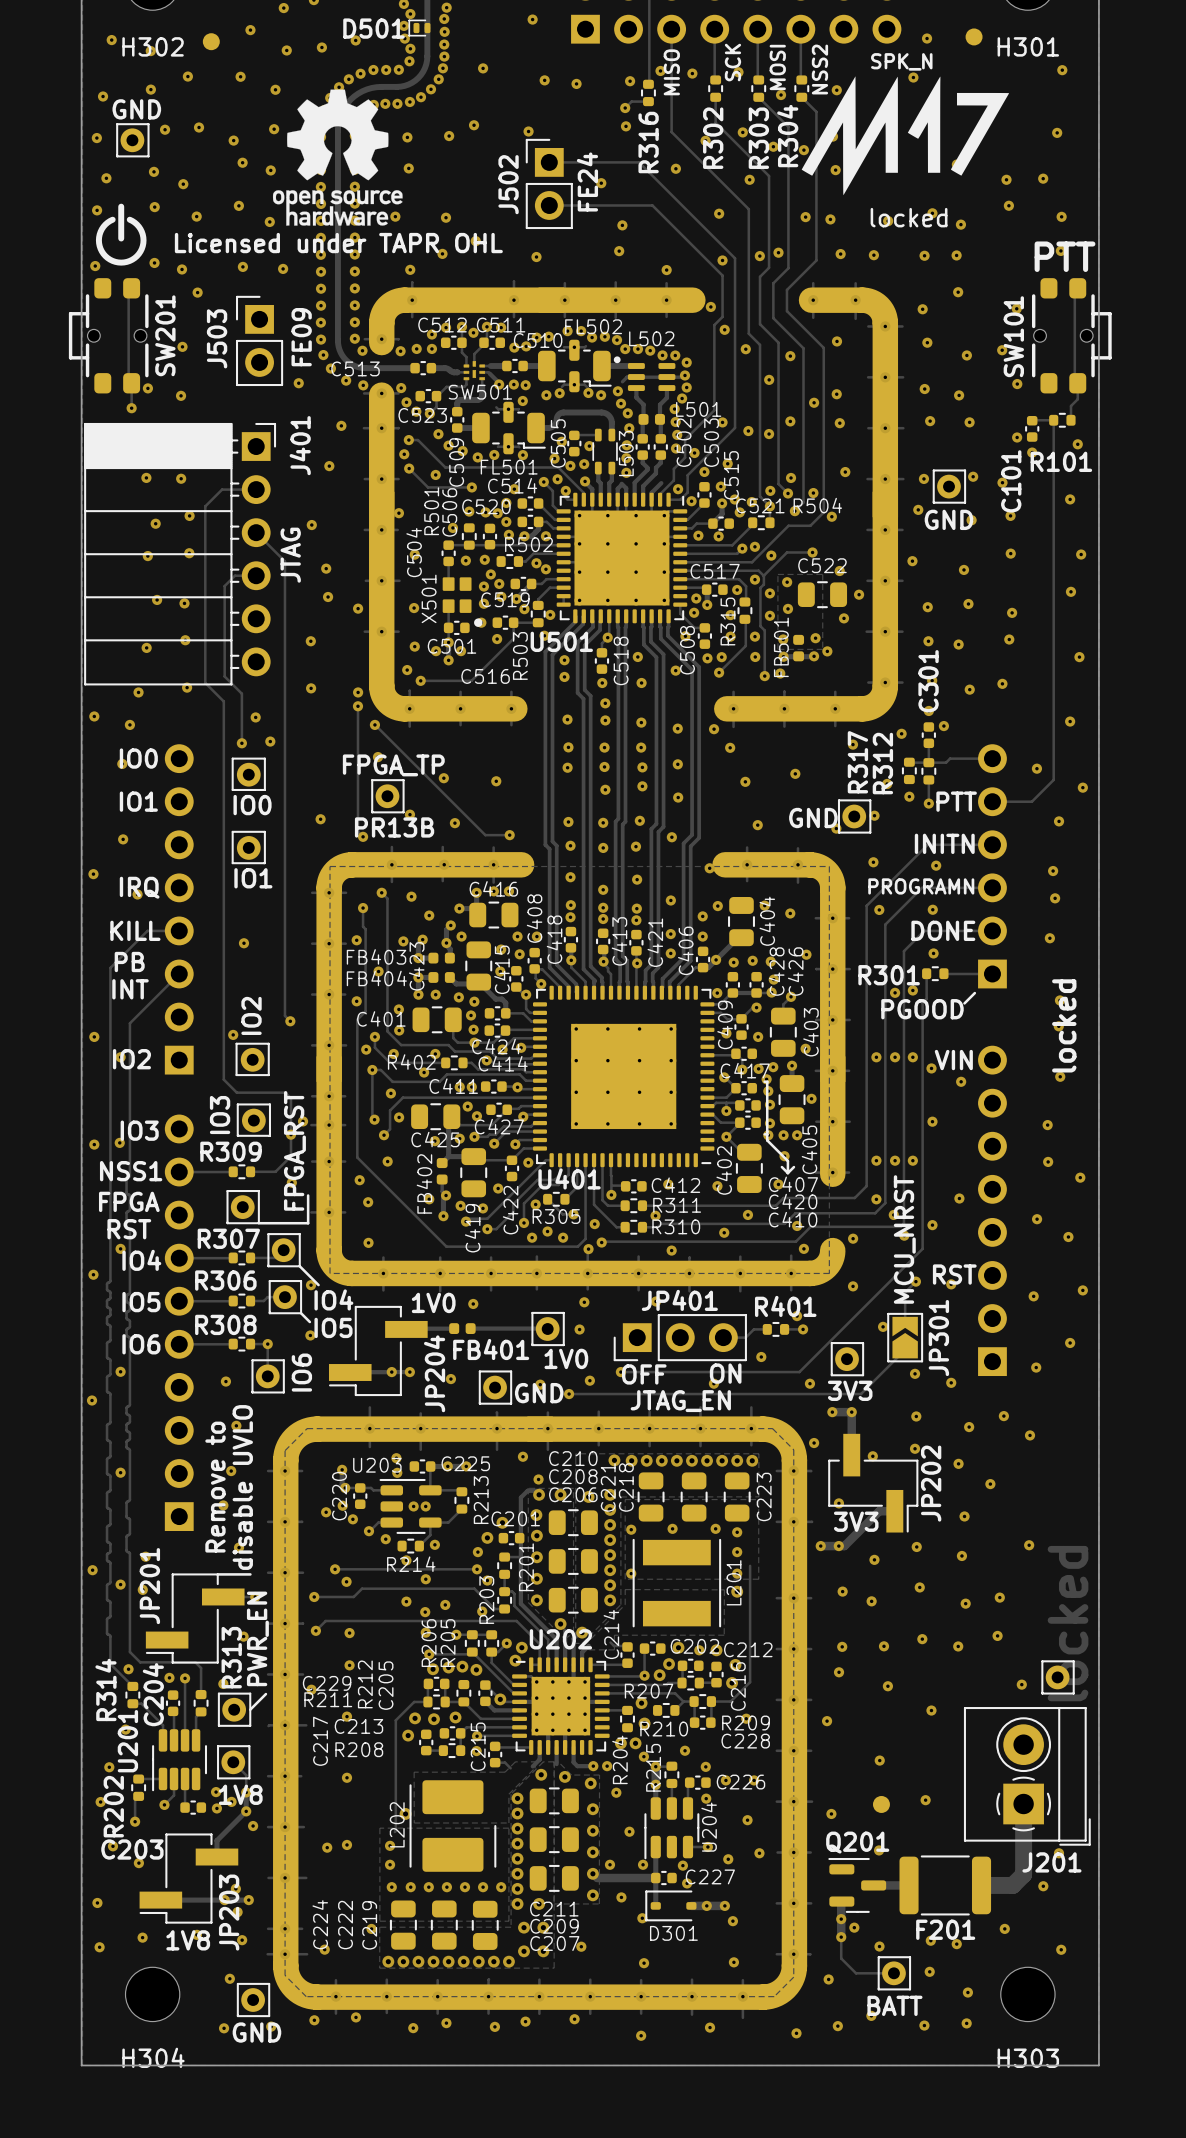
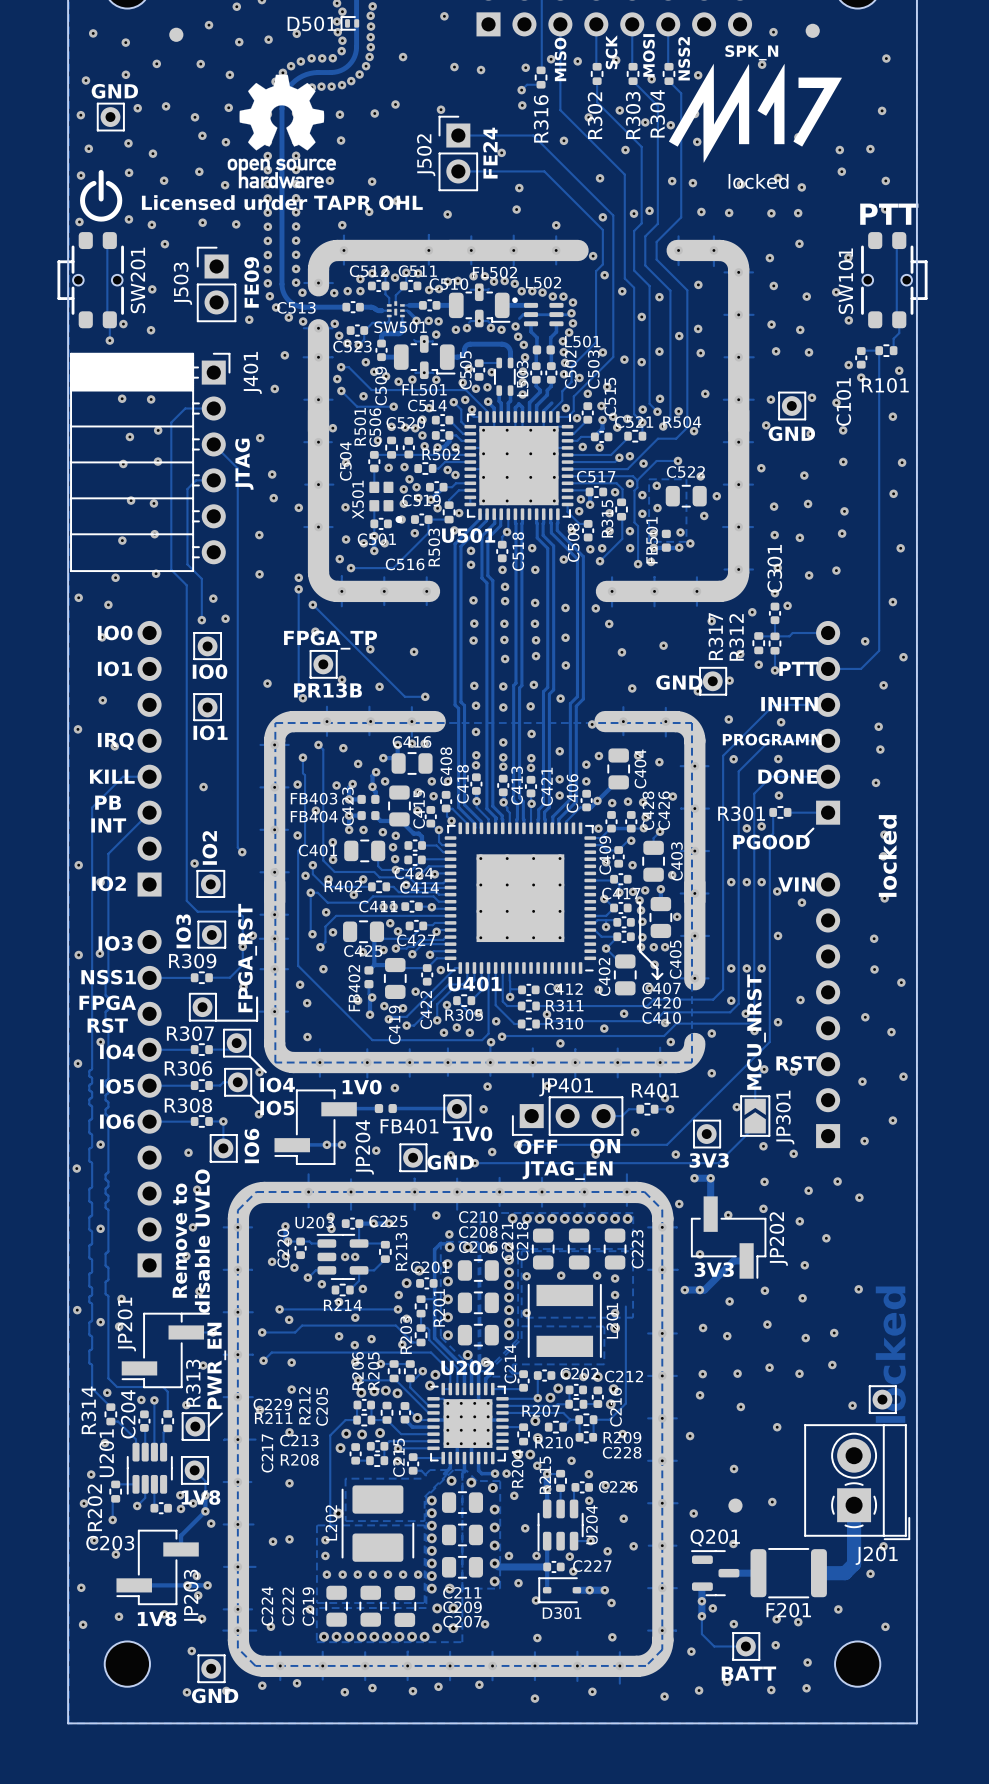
H302 name: H302 (153, 46) -> none
H301 name: H301 (1028, 46) -> none
H304 name: H304 (153, 2057) -> none
H303 name: H303 (1028, 2058) -> none

